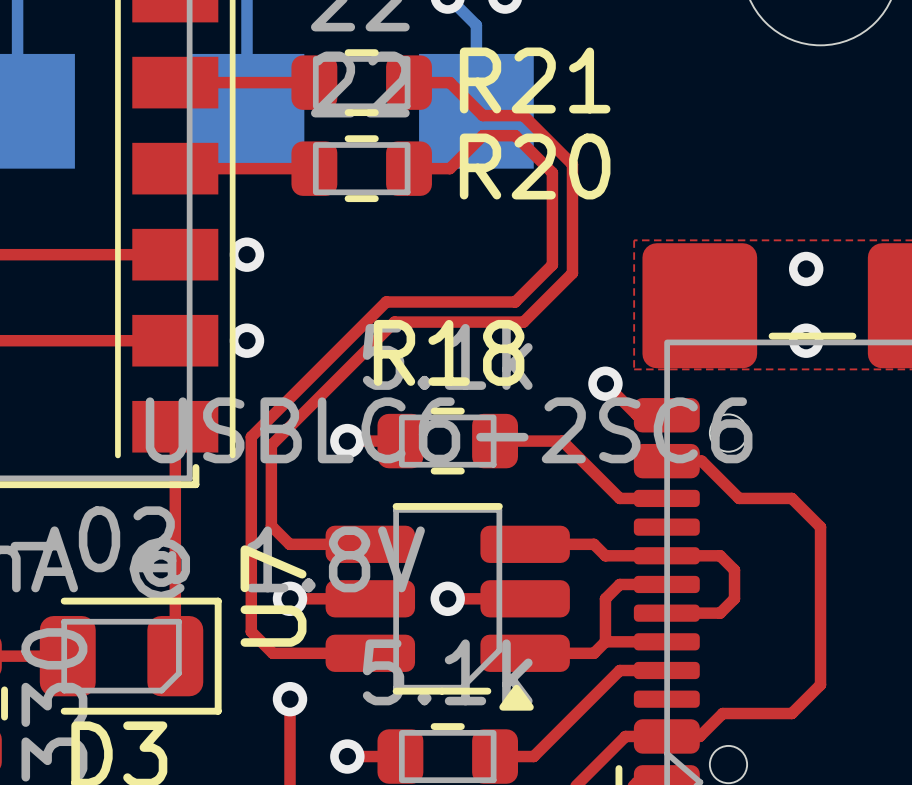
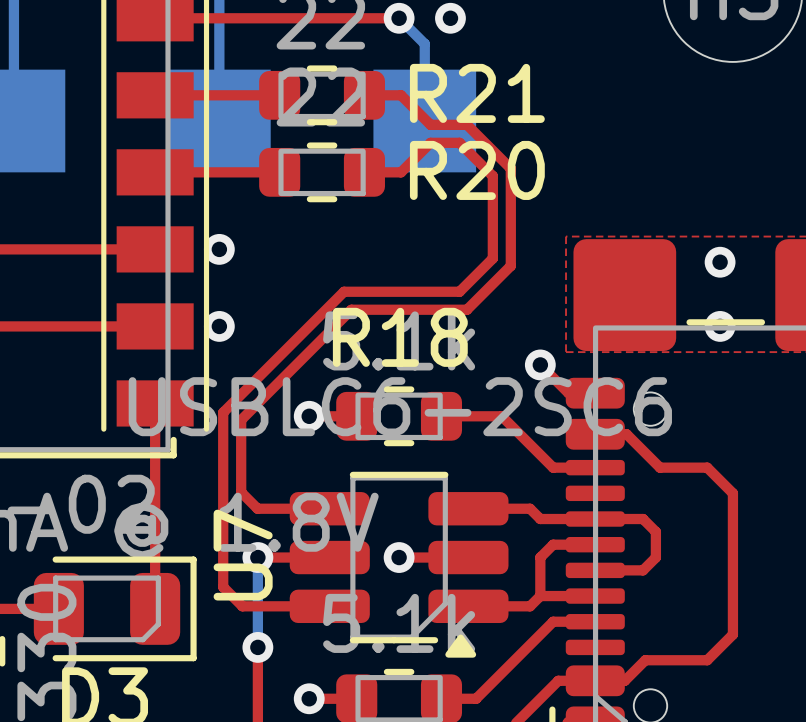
bottom track: none -> (257, 557) (257, 647)

